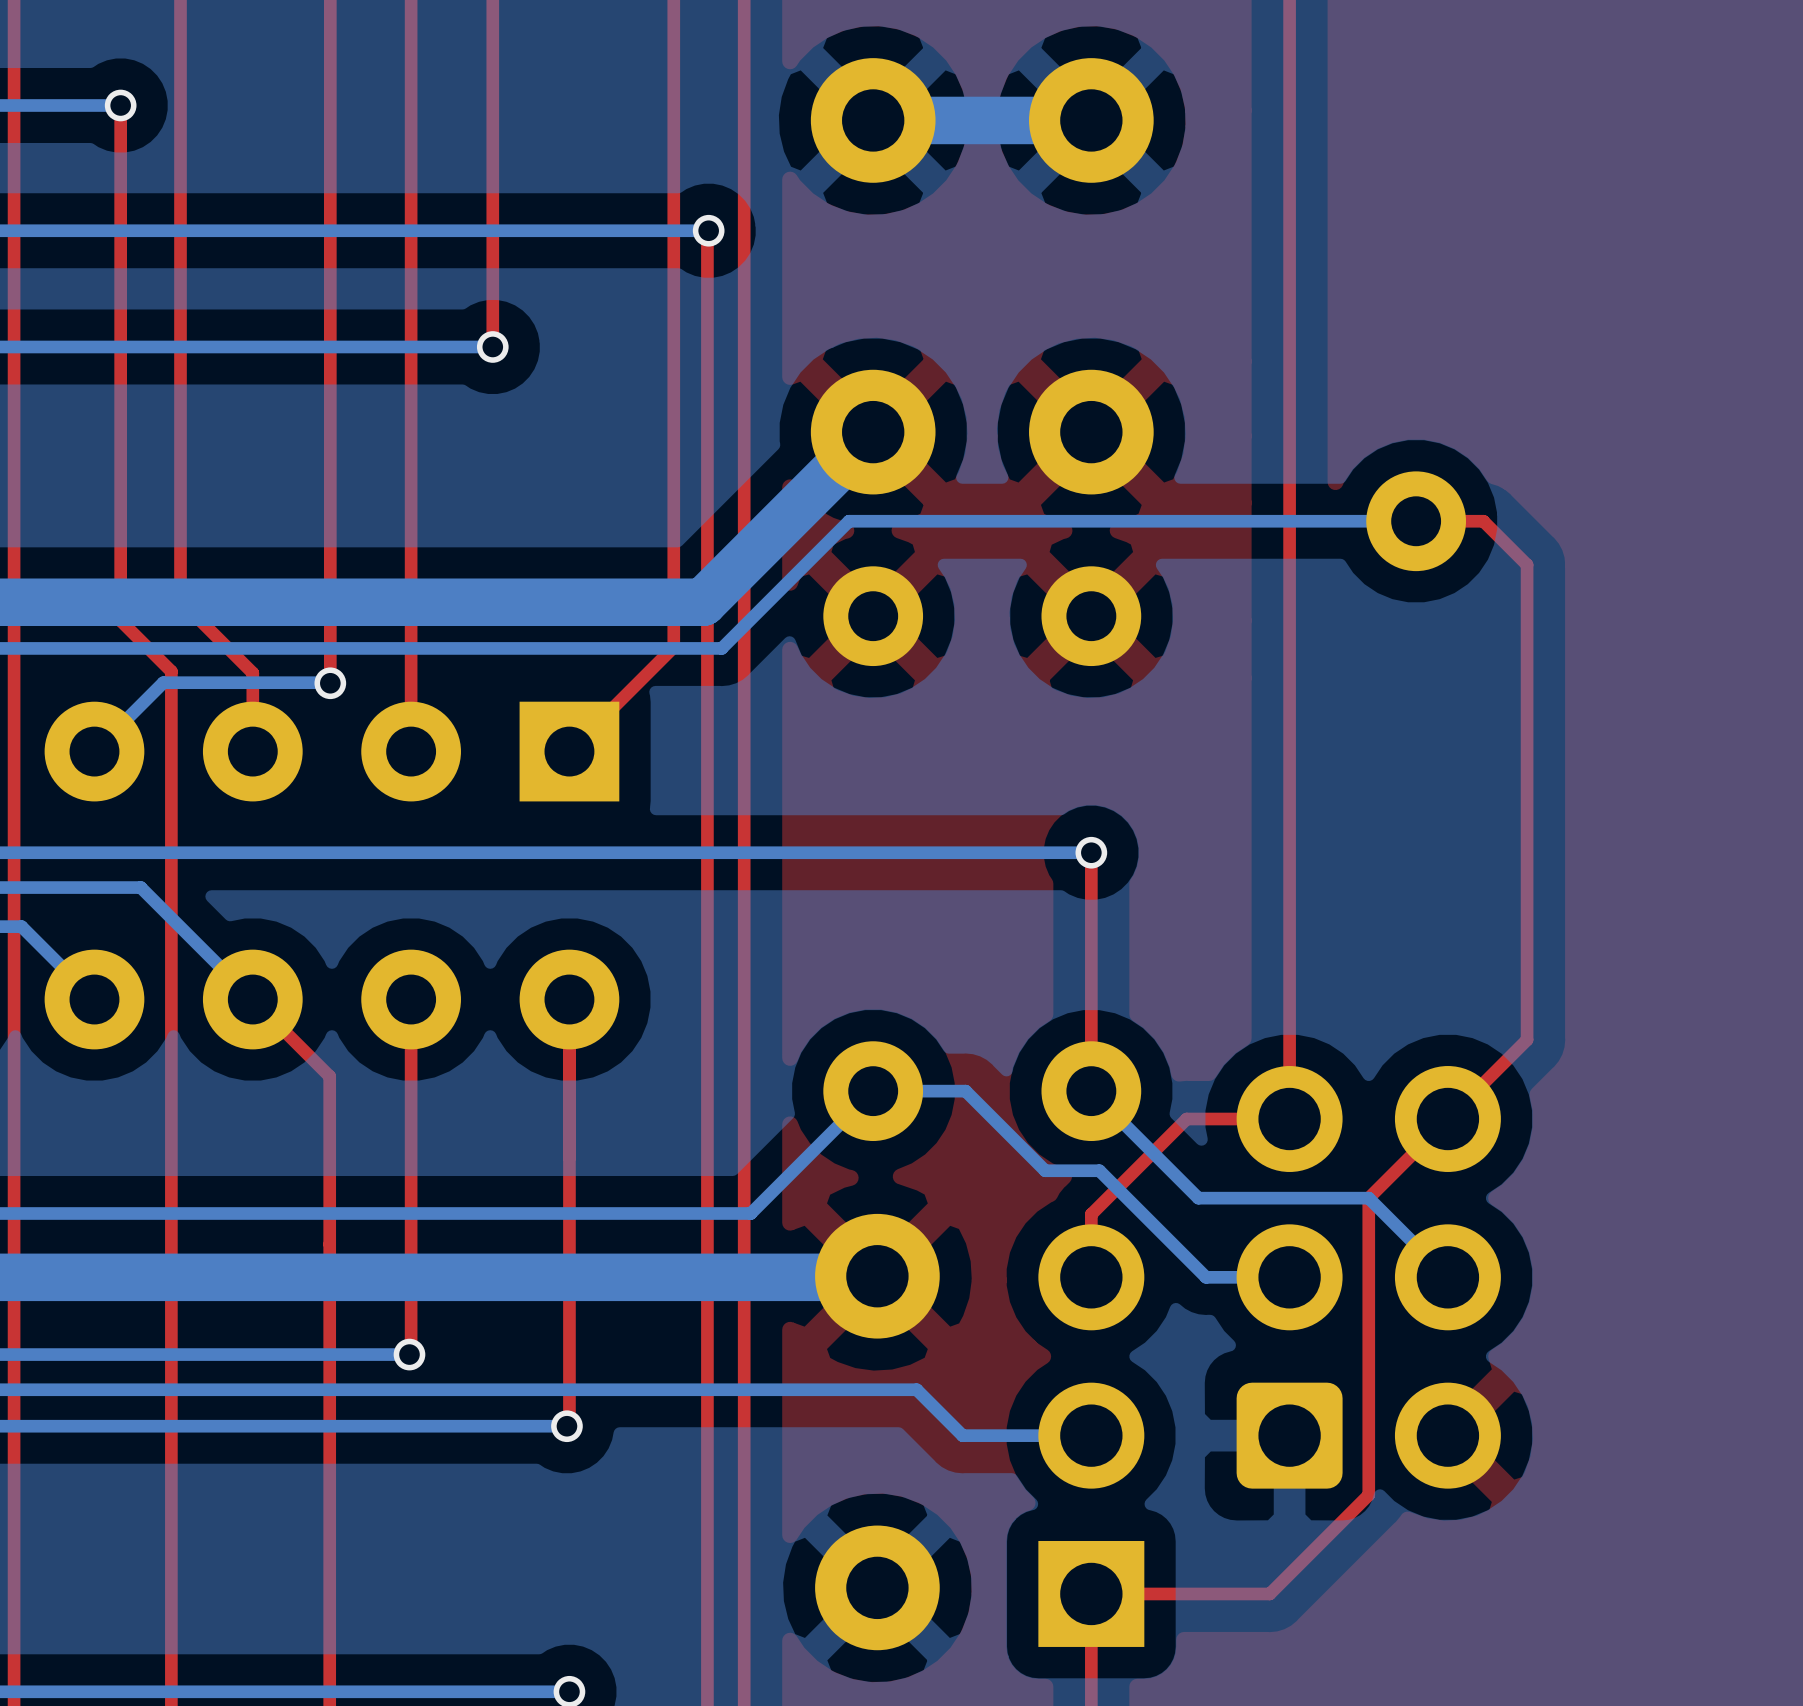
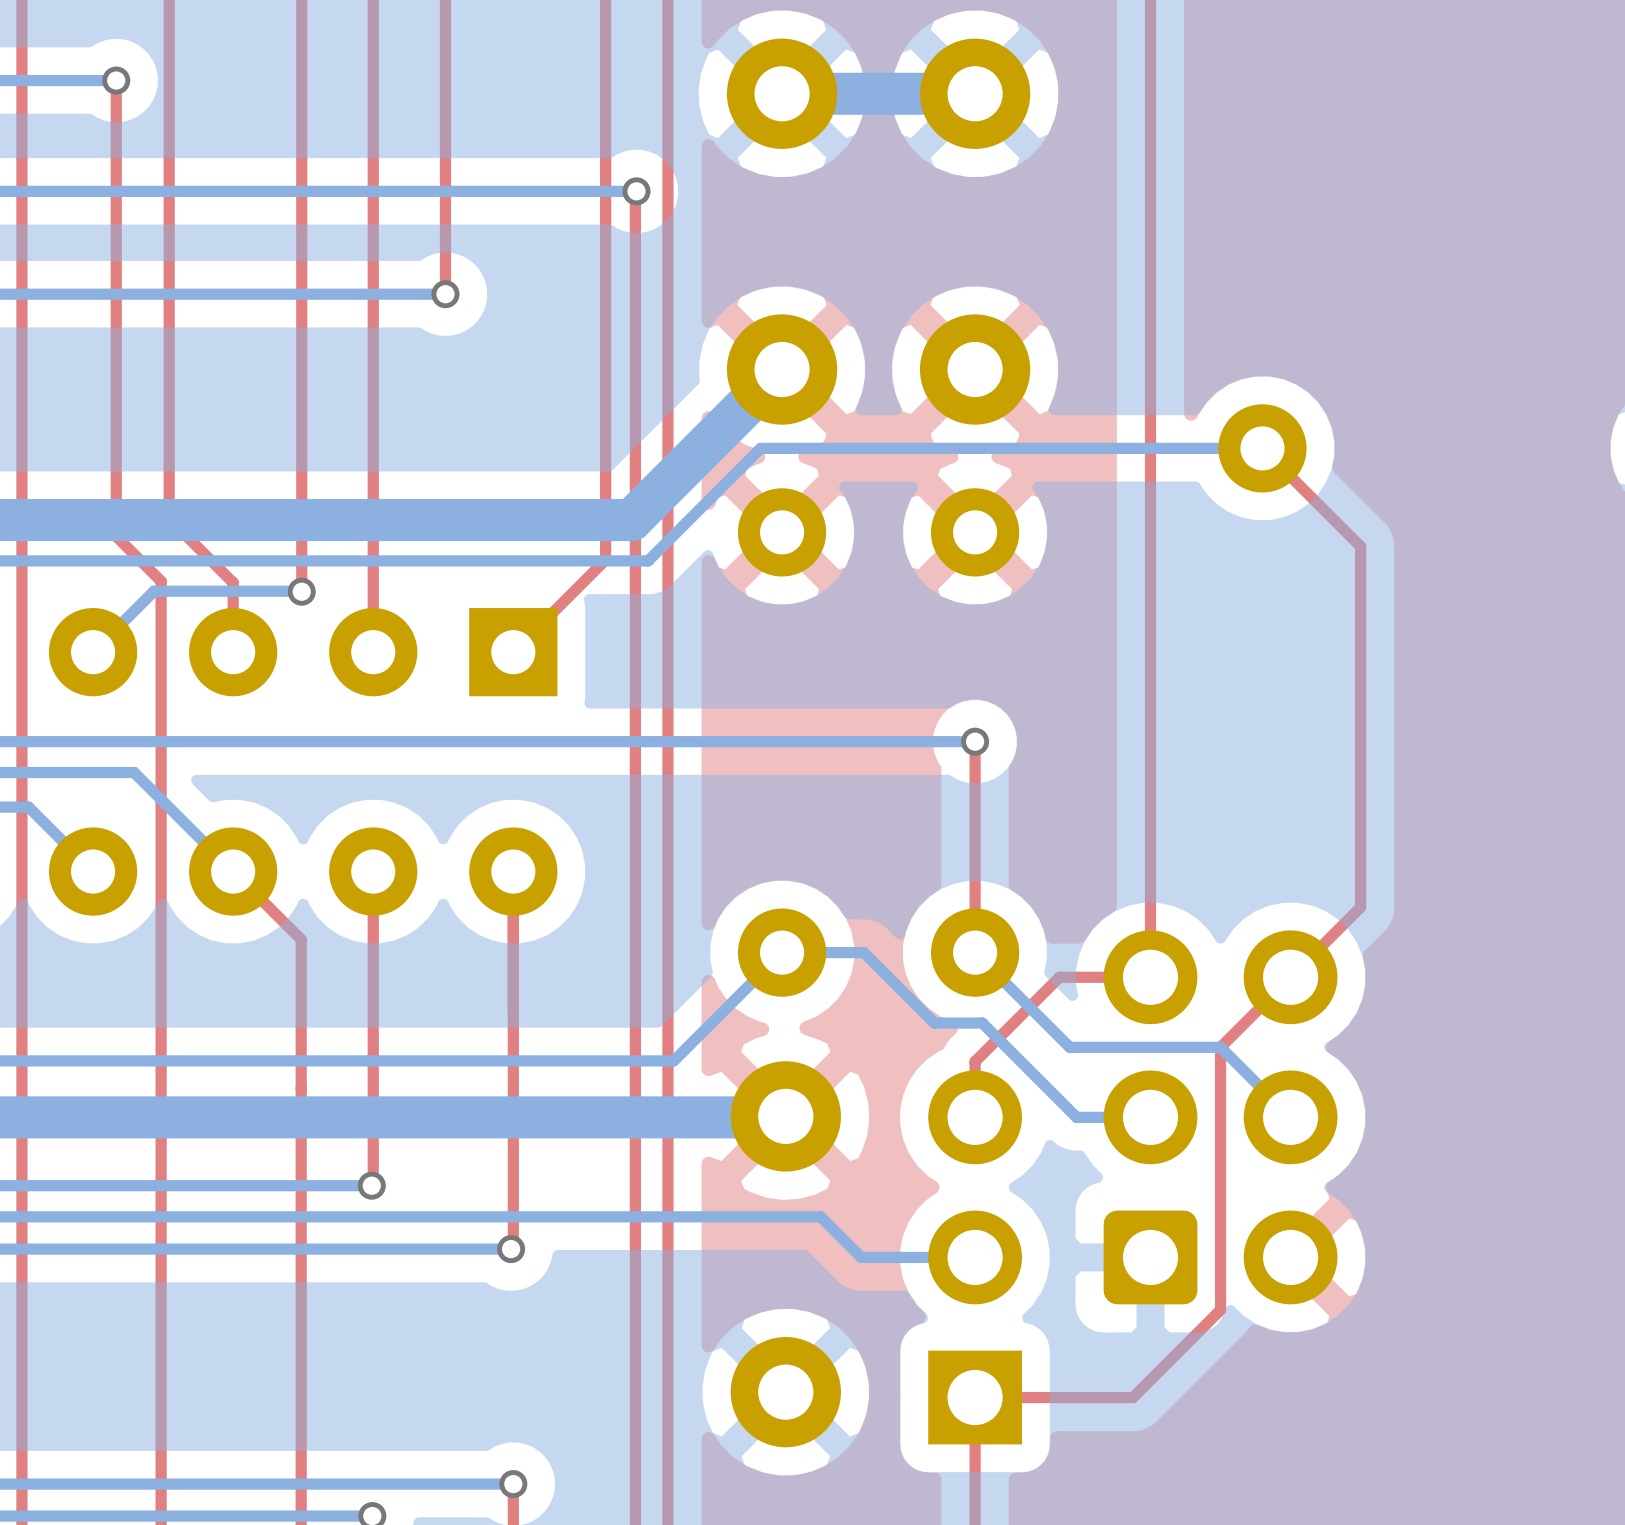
top track: (1416, 521) (1483, 521) (1527, 564) (1527, 632) -> (1262, 448) (1360, 546)

